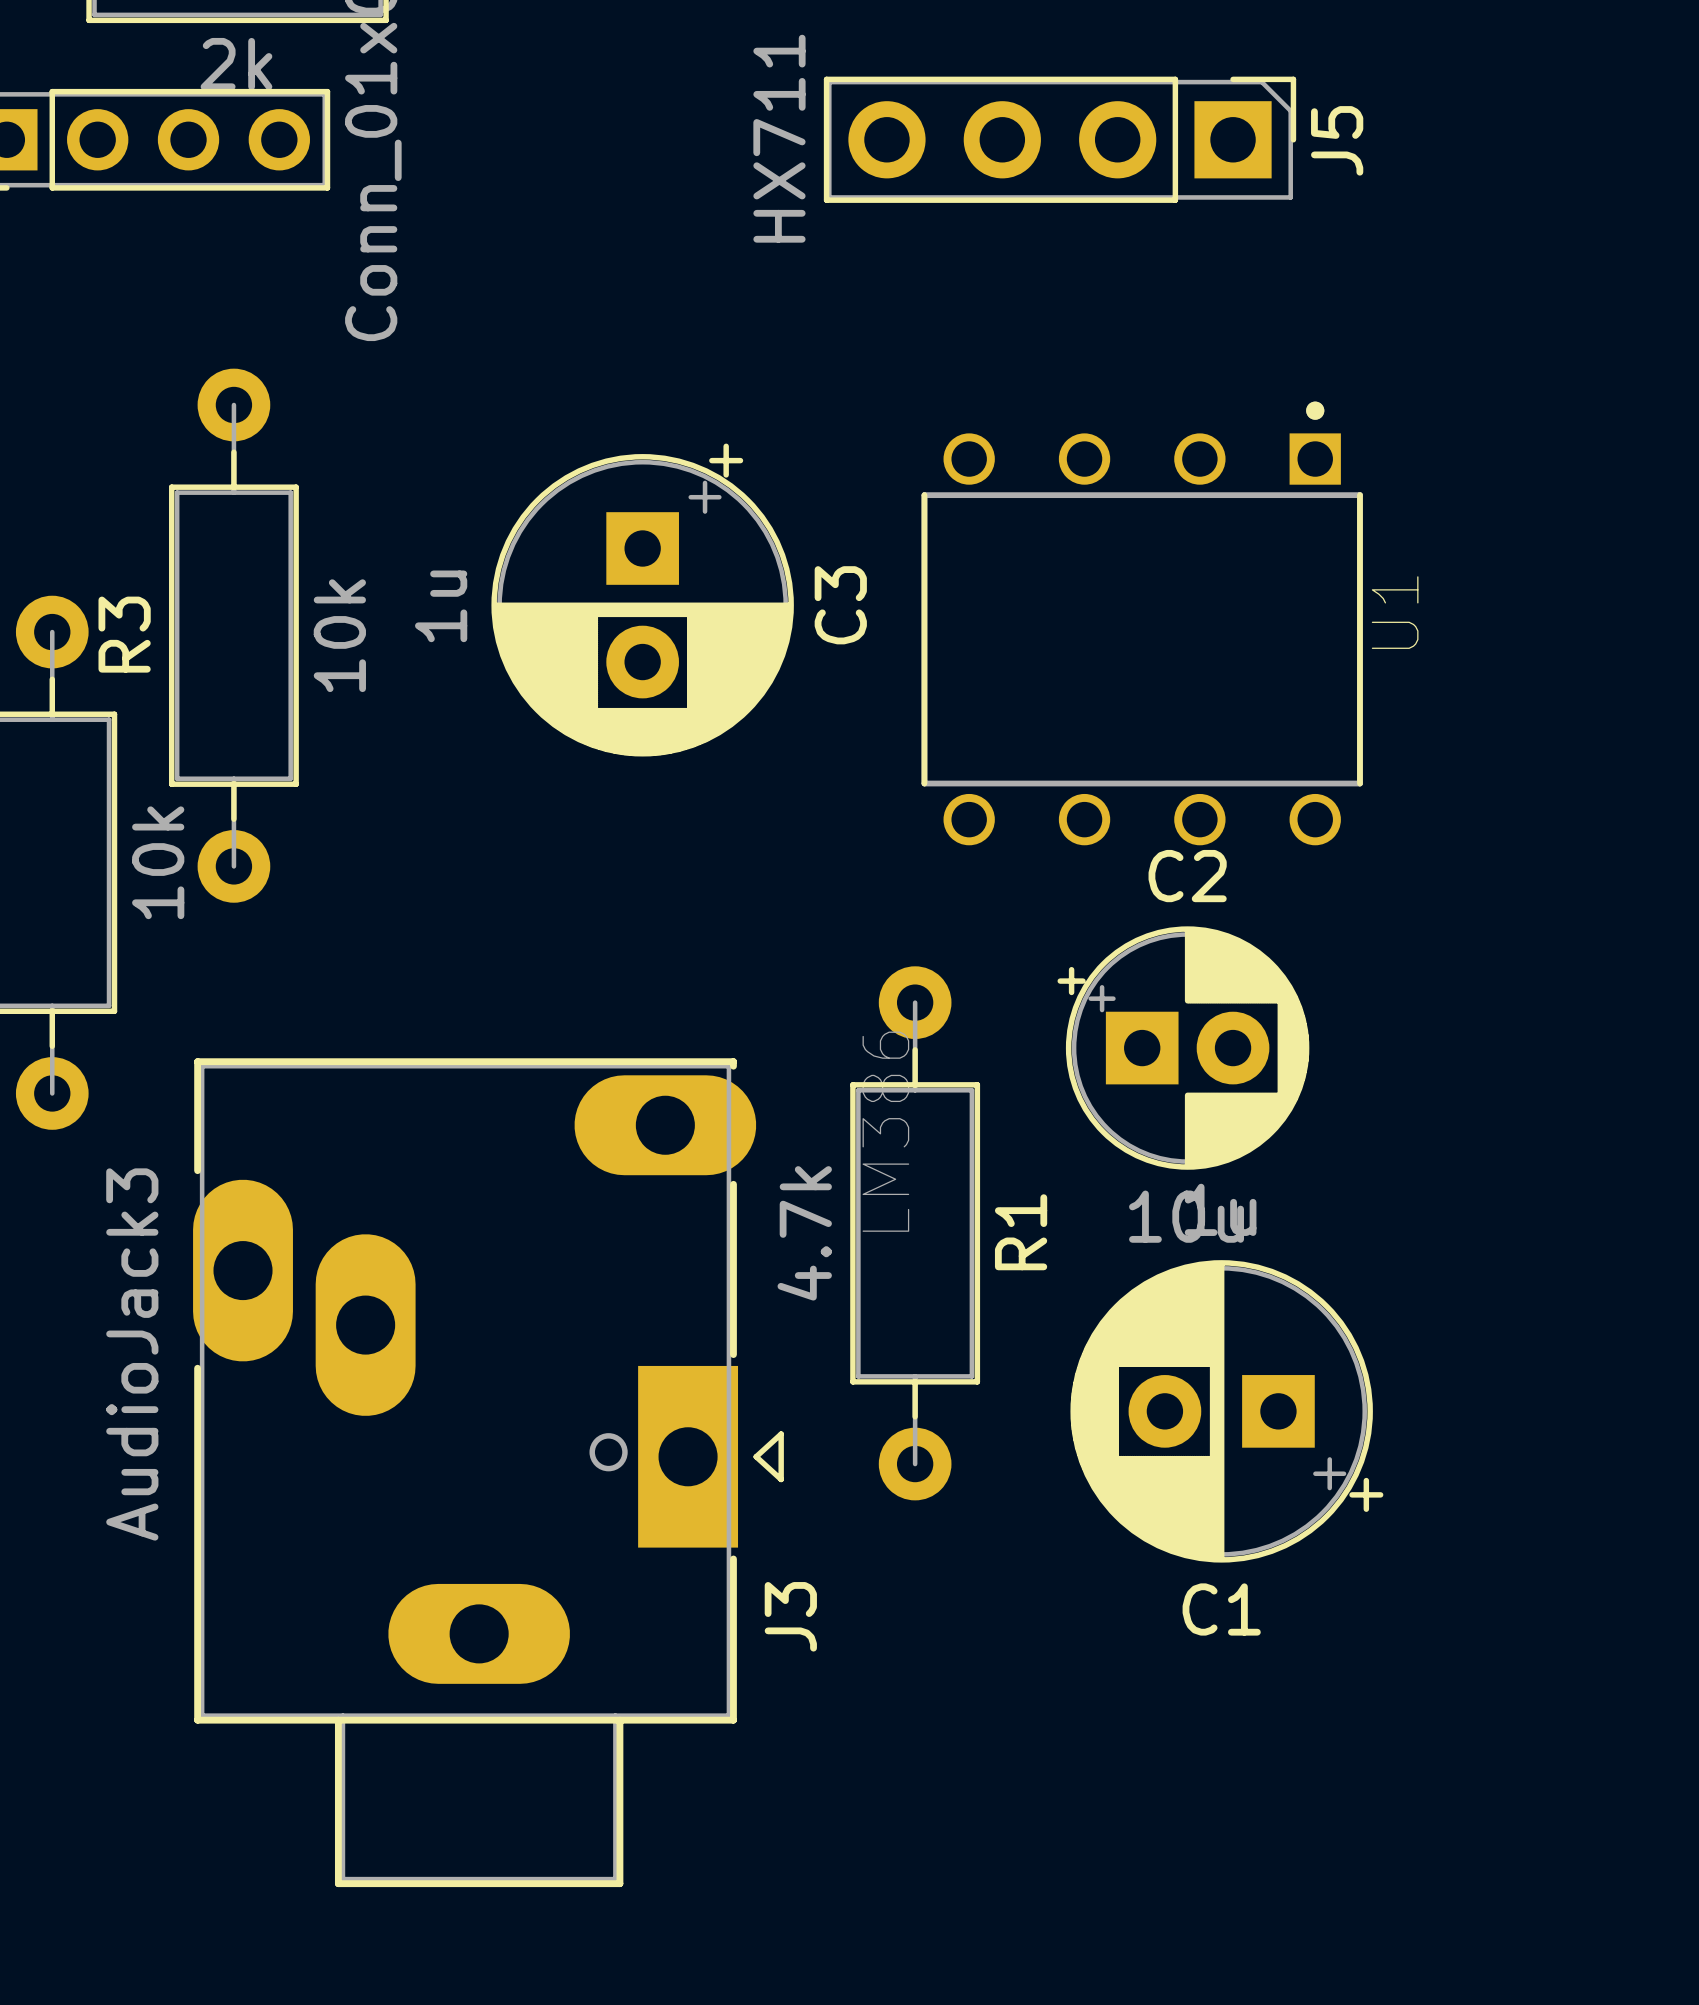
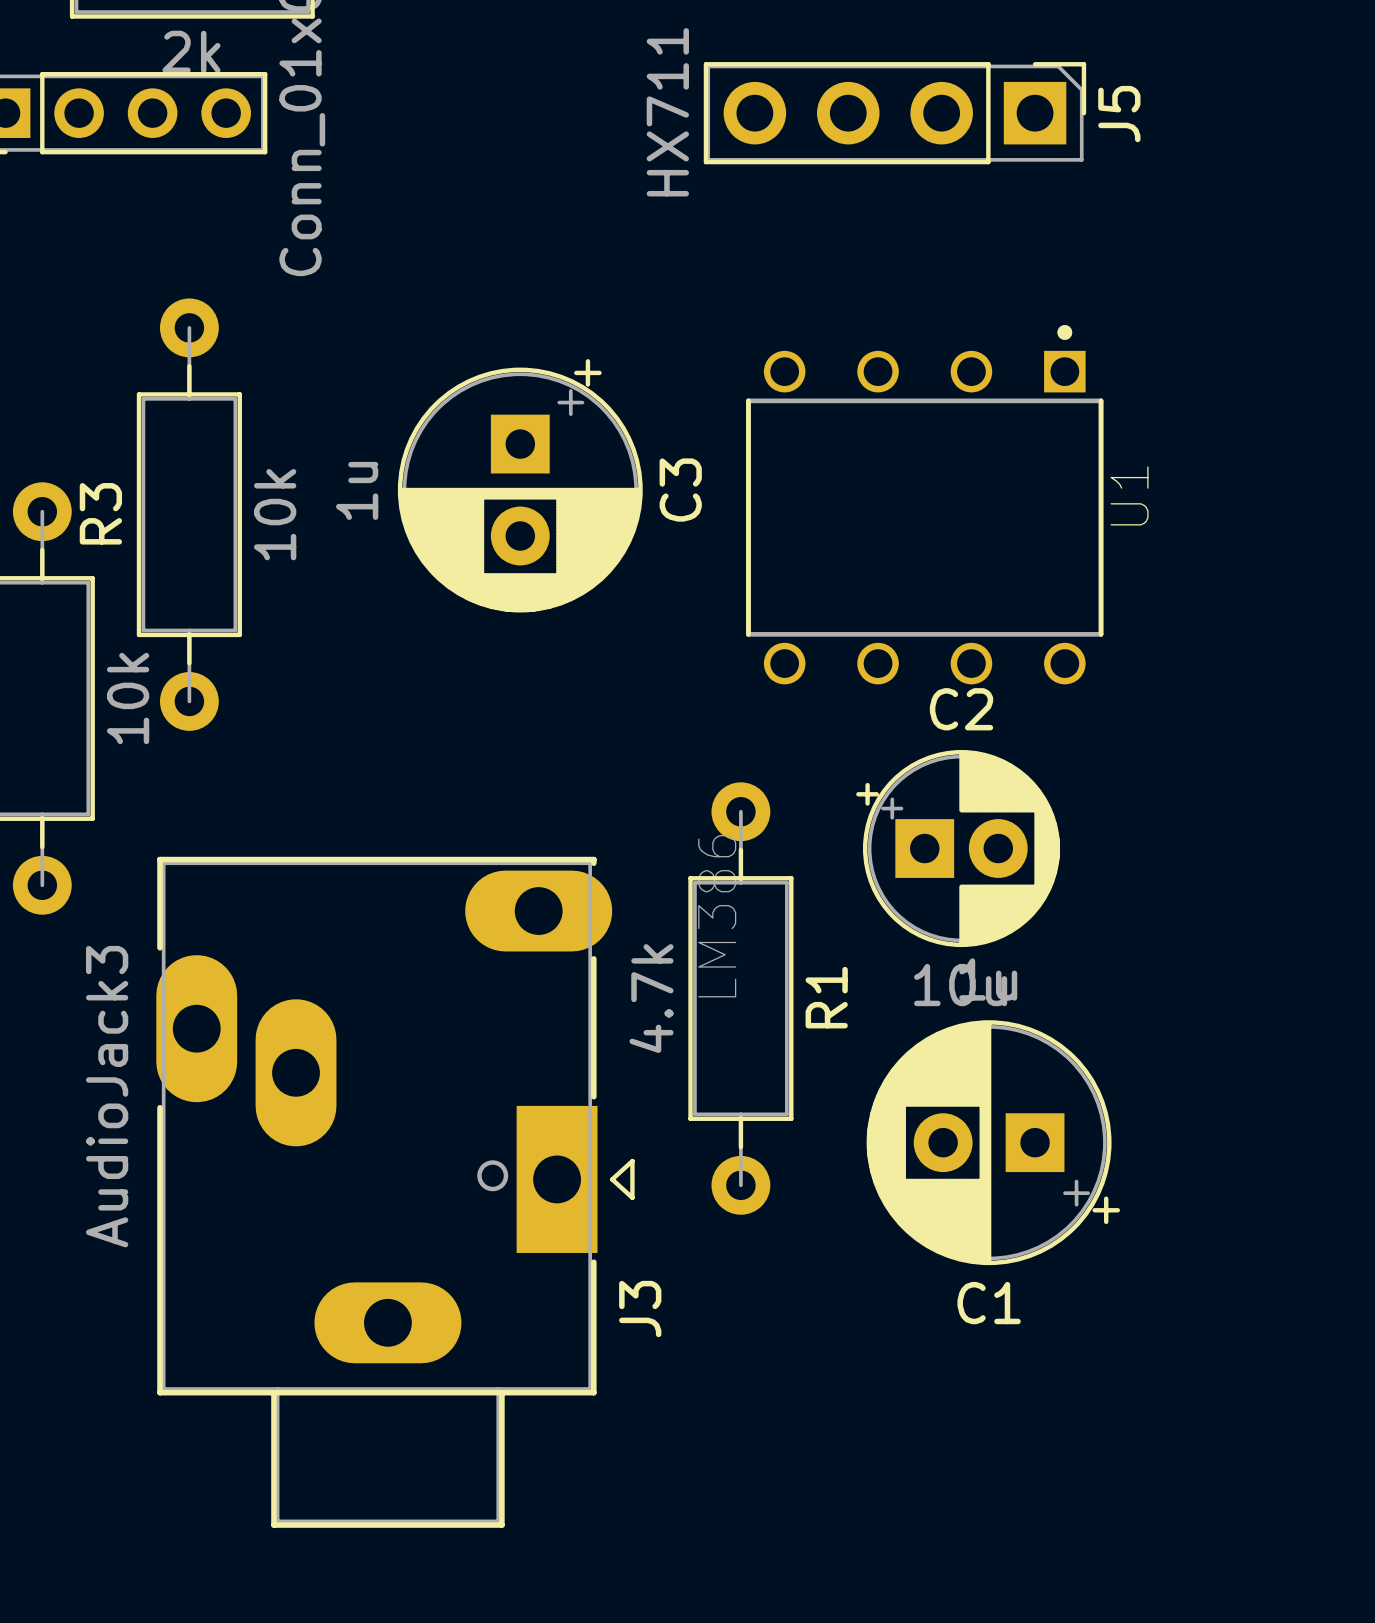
J5 position: (1060, 139) -> (894, 113)

